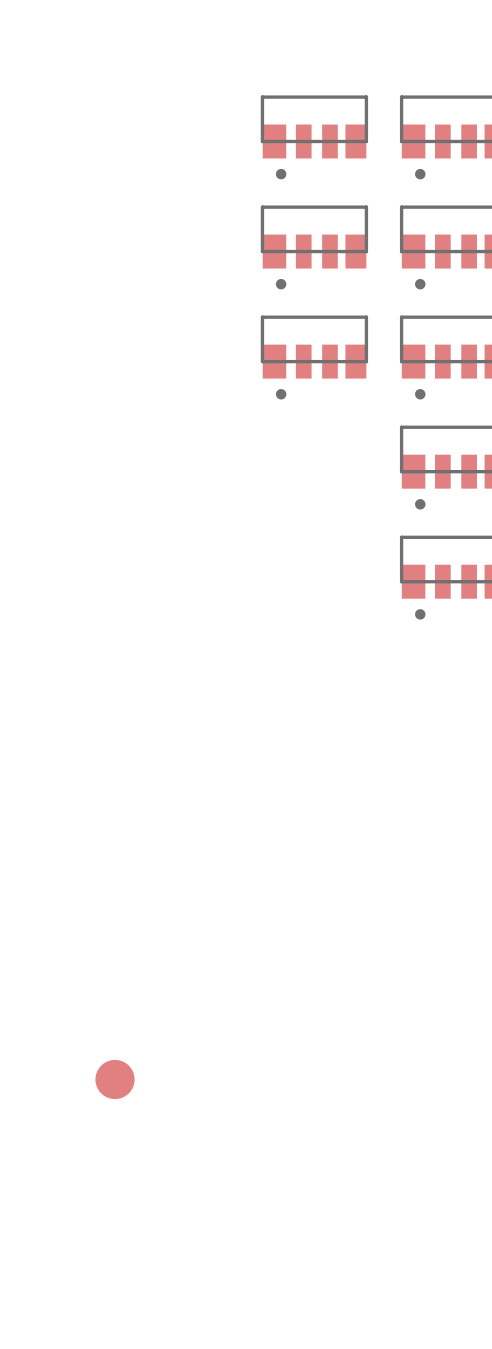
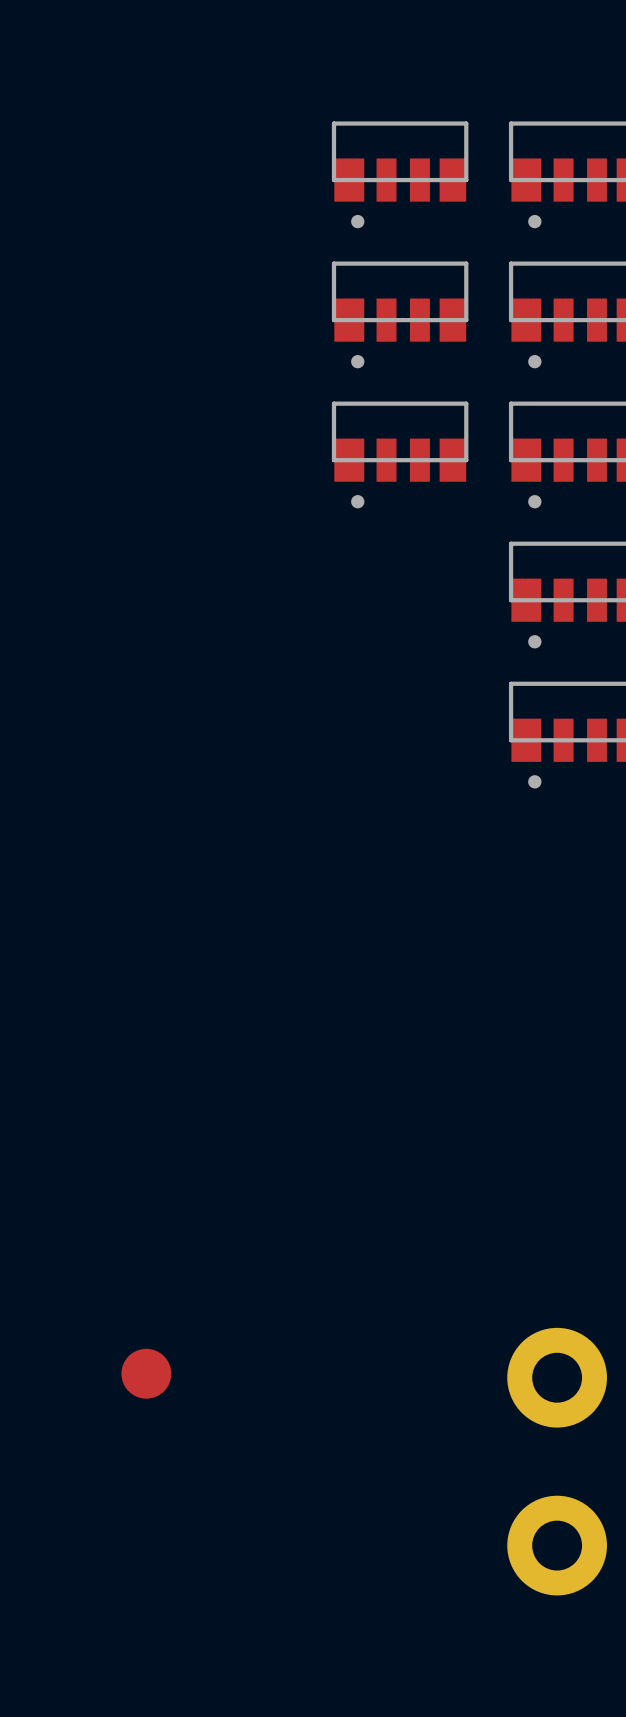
part: none -> (557, 1377)
part: none -> (557, 1545)

